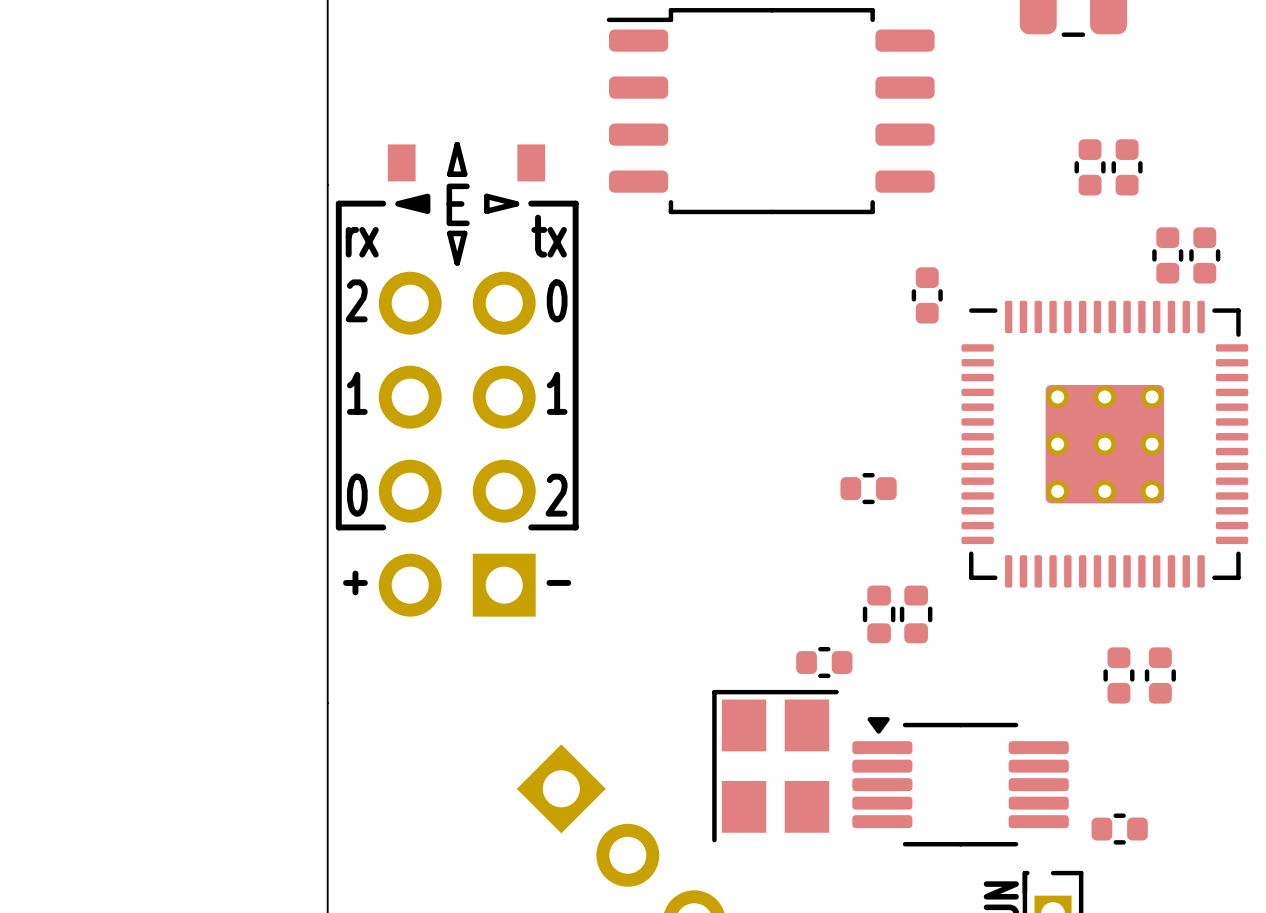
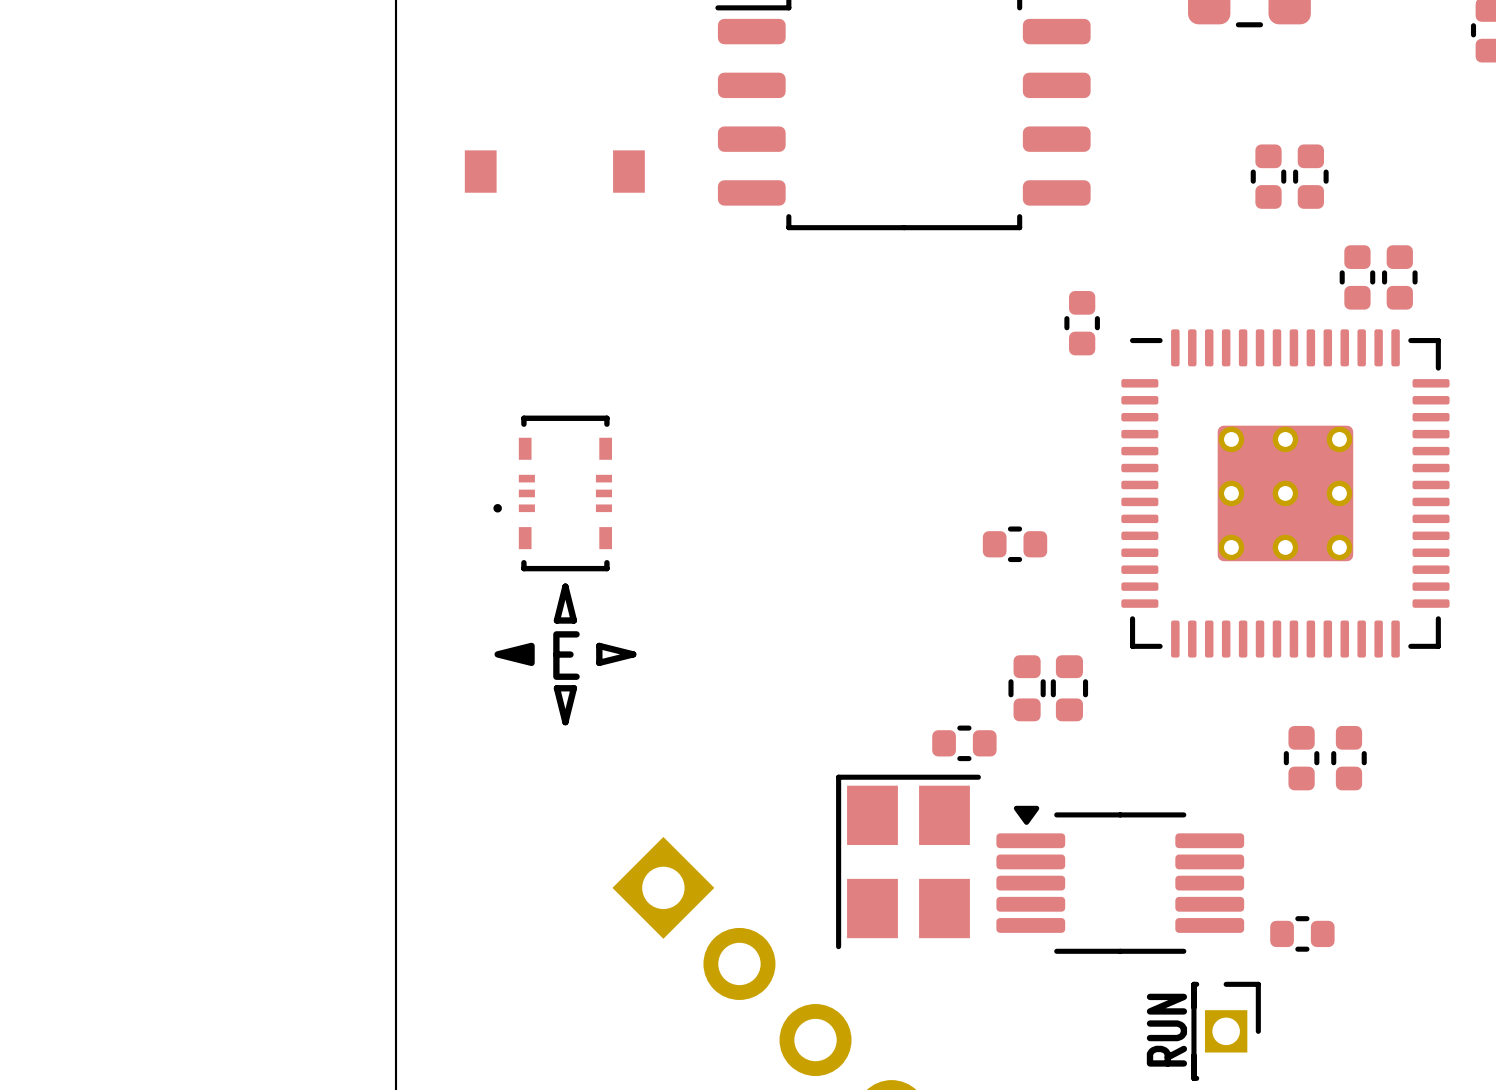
line: (457, 144) (464, 174) (449, 174) (457, 144) -> (565, 586) (573, 620) (556, 620) (565, 586)
line: (486, 196) (486, 211) (516, 203) (486, 196) -> (599, 645) (599, 662) (633, 654) (599, 645)
part footprint: [335, 200, 579, 617] -> [493, 415, 613, 572]
drawing position: (412, 203) -> (514, 654)
text position: E (458, 204) -> E (566, 655)
line: (449, 233) (464, 233) (457, 263) (449, 233) -> (556, 688) (573, 688) (565, 722) (556, 688)

